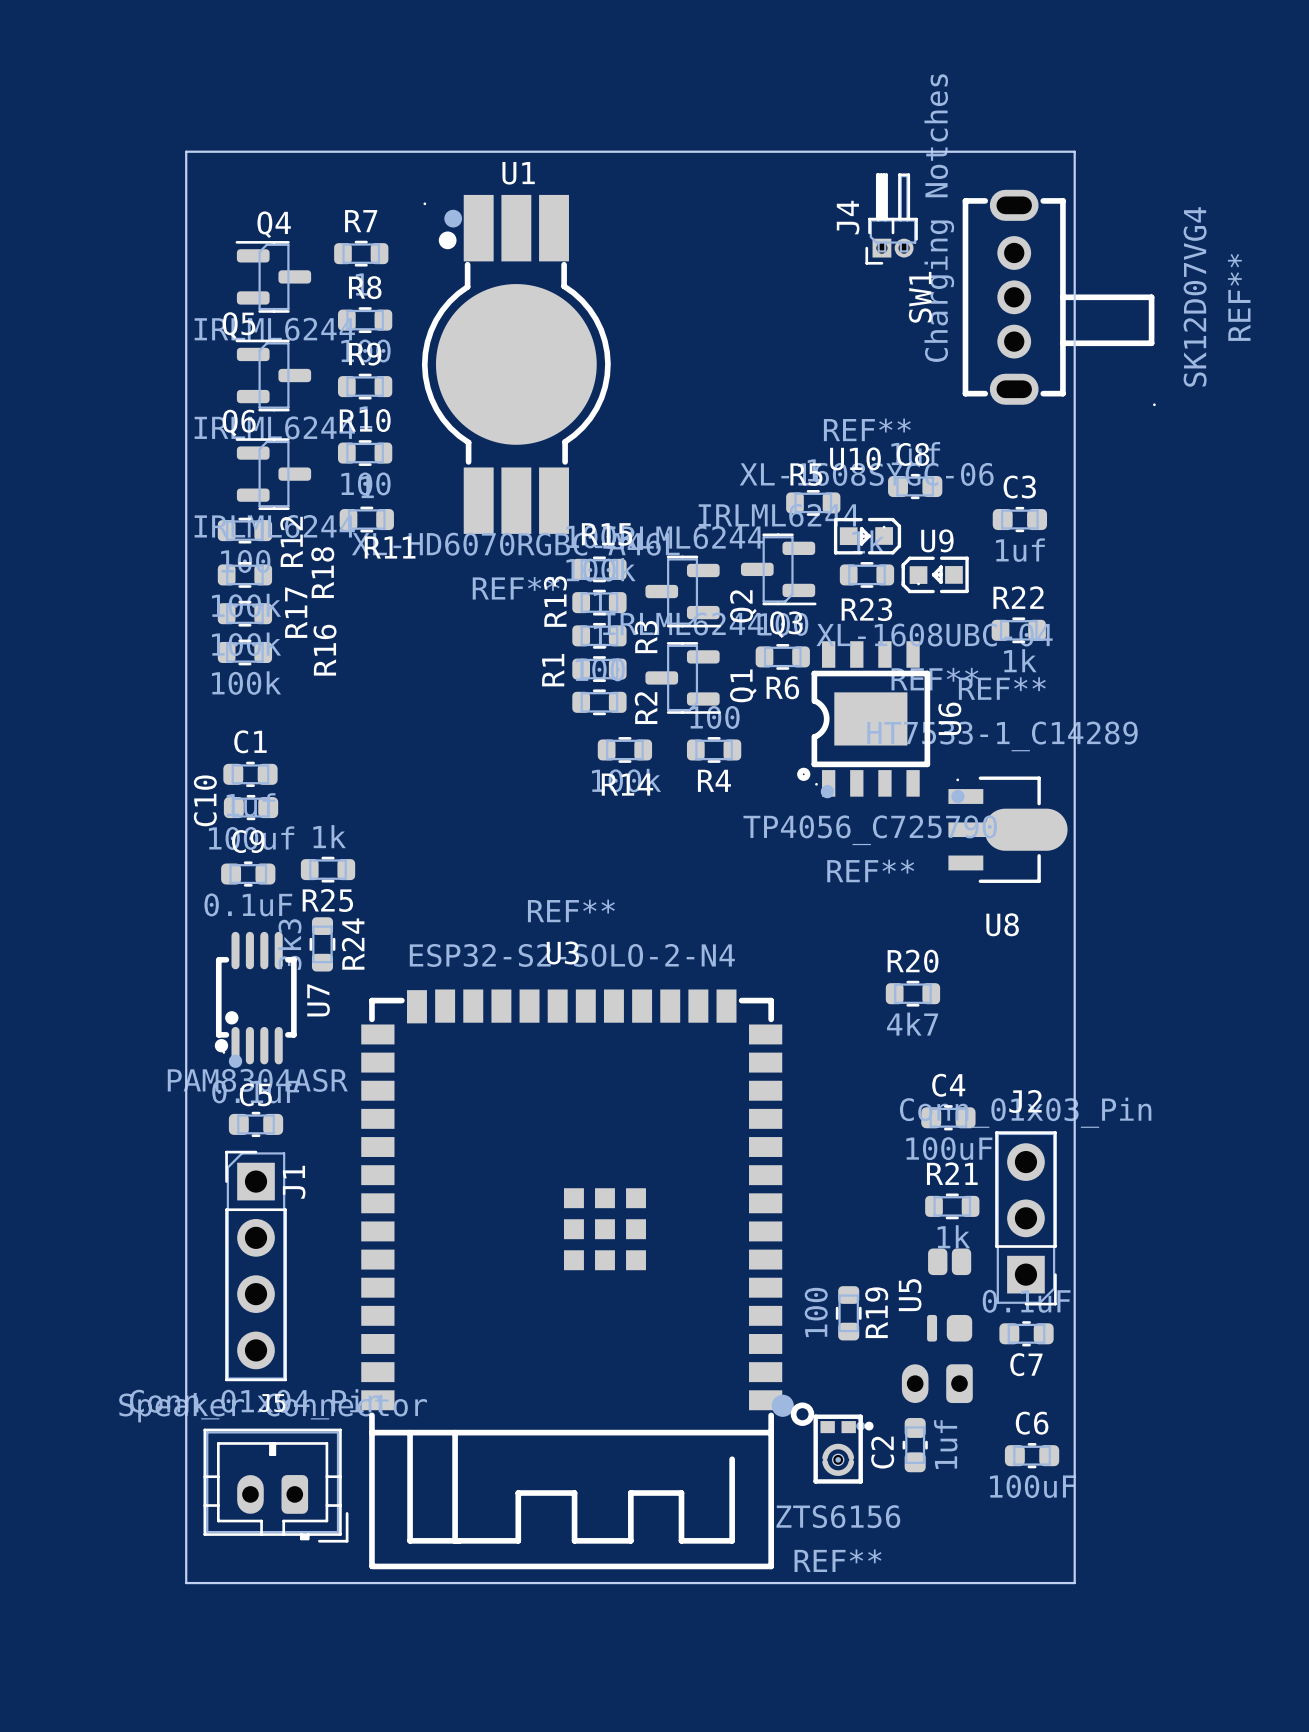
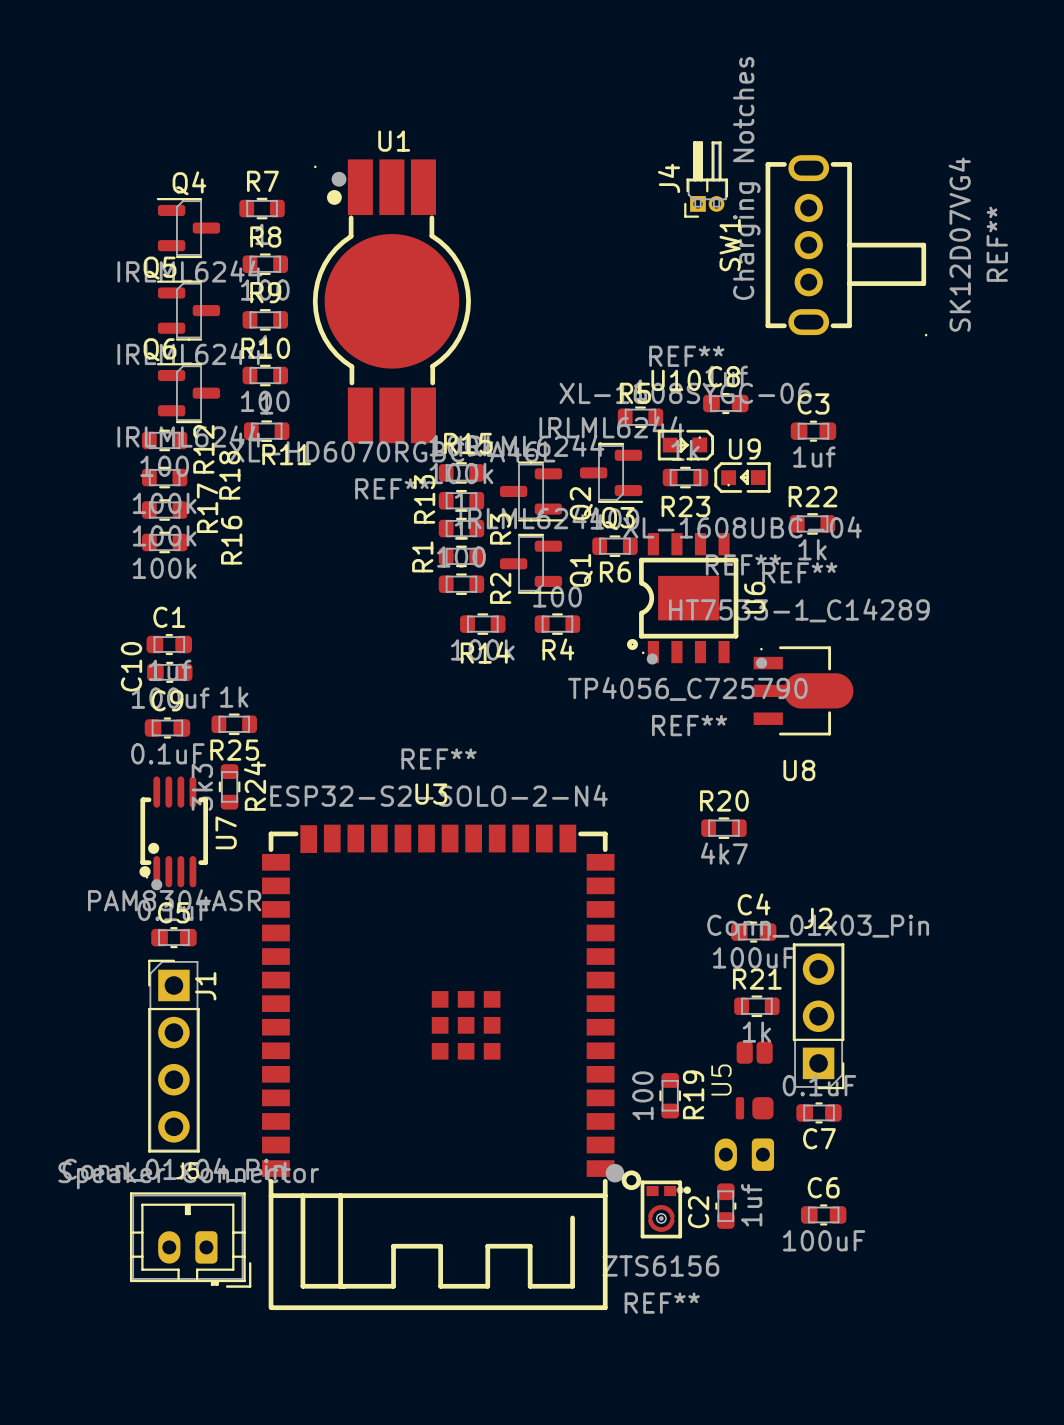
board edge: (186, 151) (1074, 151) (1074, 1583) (186, 1583) (186, 151) -> none

